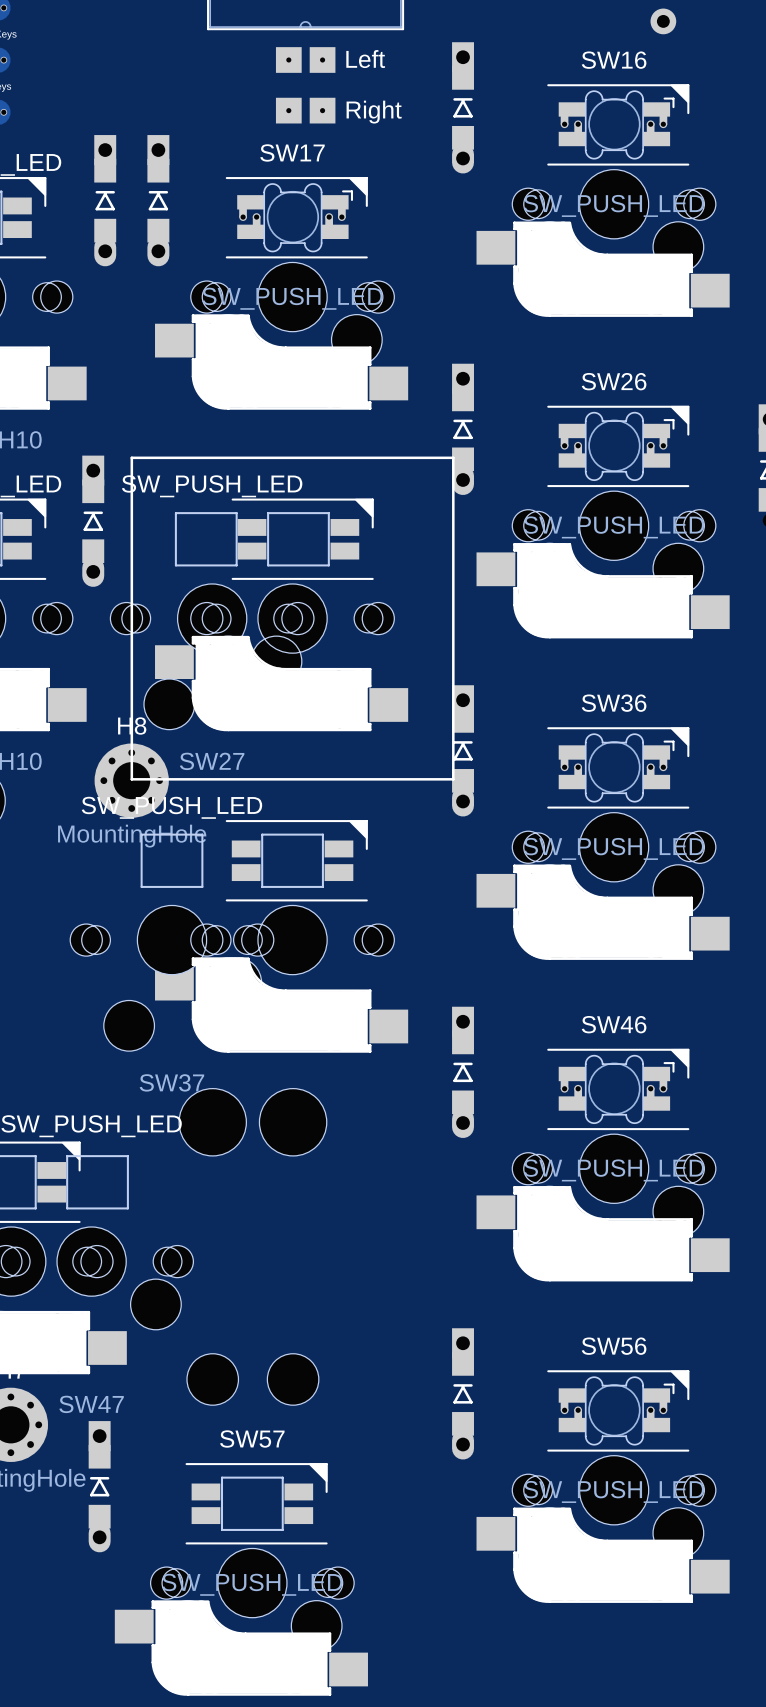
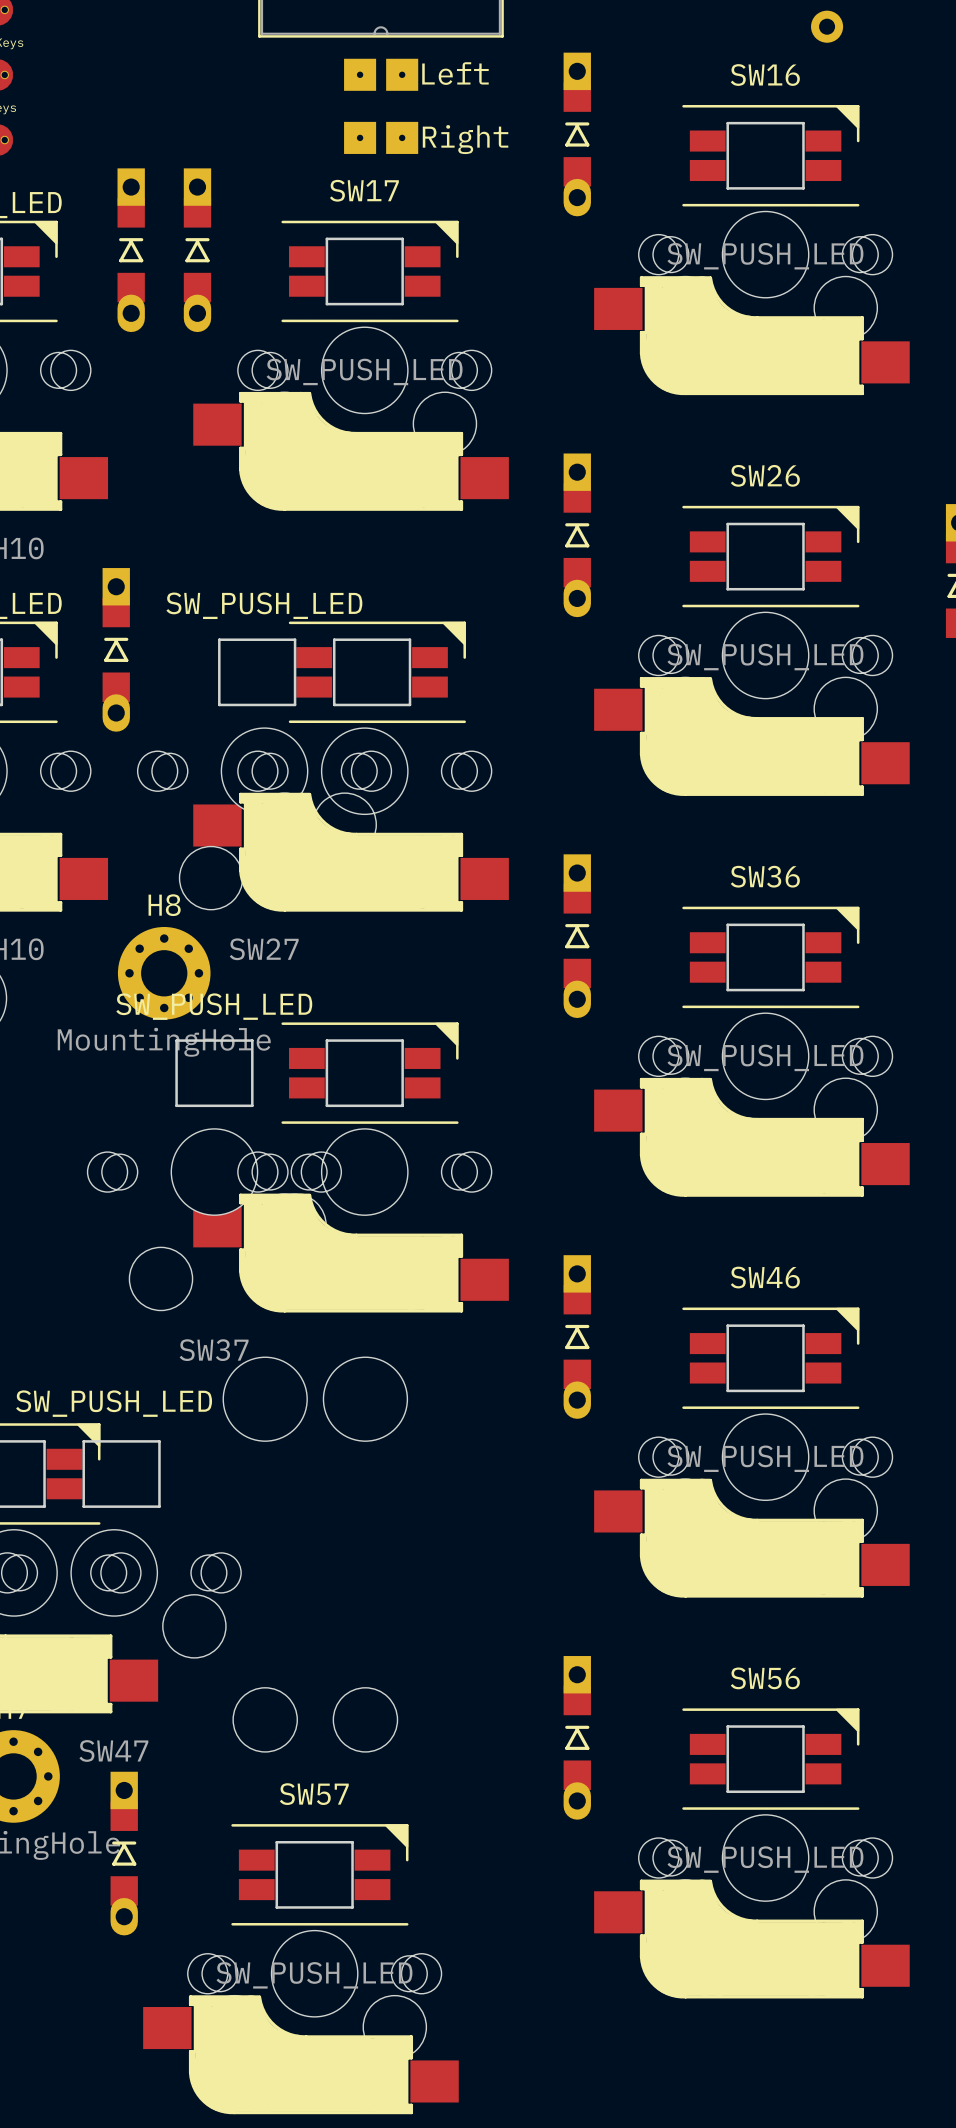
SW16 footprint: [476, 84, 730, 317] -> [594, 105, 910, 396]
SW17 footprint: [155, 177, 409, 410] -> [193, 220, 509, 511]
SW26 footprint: [476, 405, 730, 639] -> [594, 505, 910, 796]
SW27 footprint: [110, 456, 455, 781] -> [137, 621, 509, 912]
SW36 footprint: [476, 727, 730, 960] -> [594, 906, 910, 1197]
SW46 footprint: [476, 1048, 730, 1282] -> [594, 1307, 910, 1598]
SW56 footprint: [476, 1370, 730, 1603] -> [594, 1708, 910, 1999]

